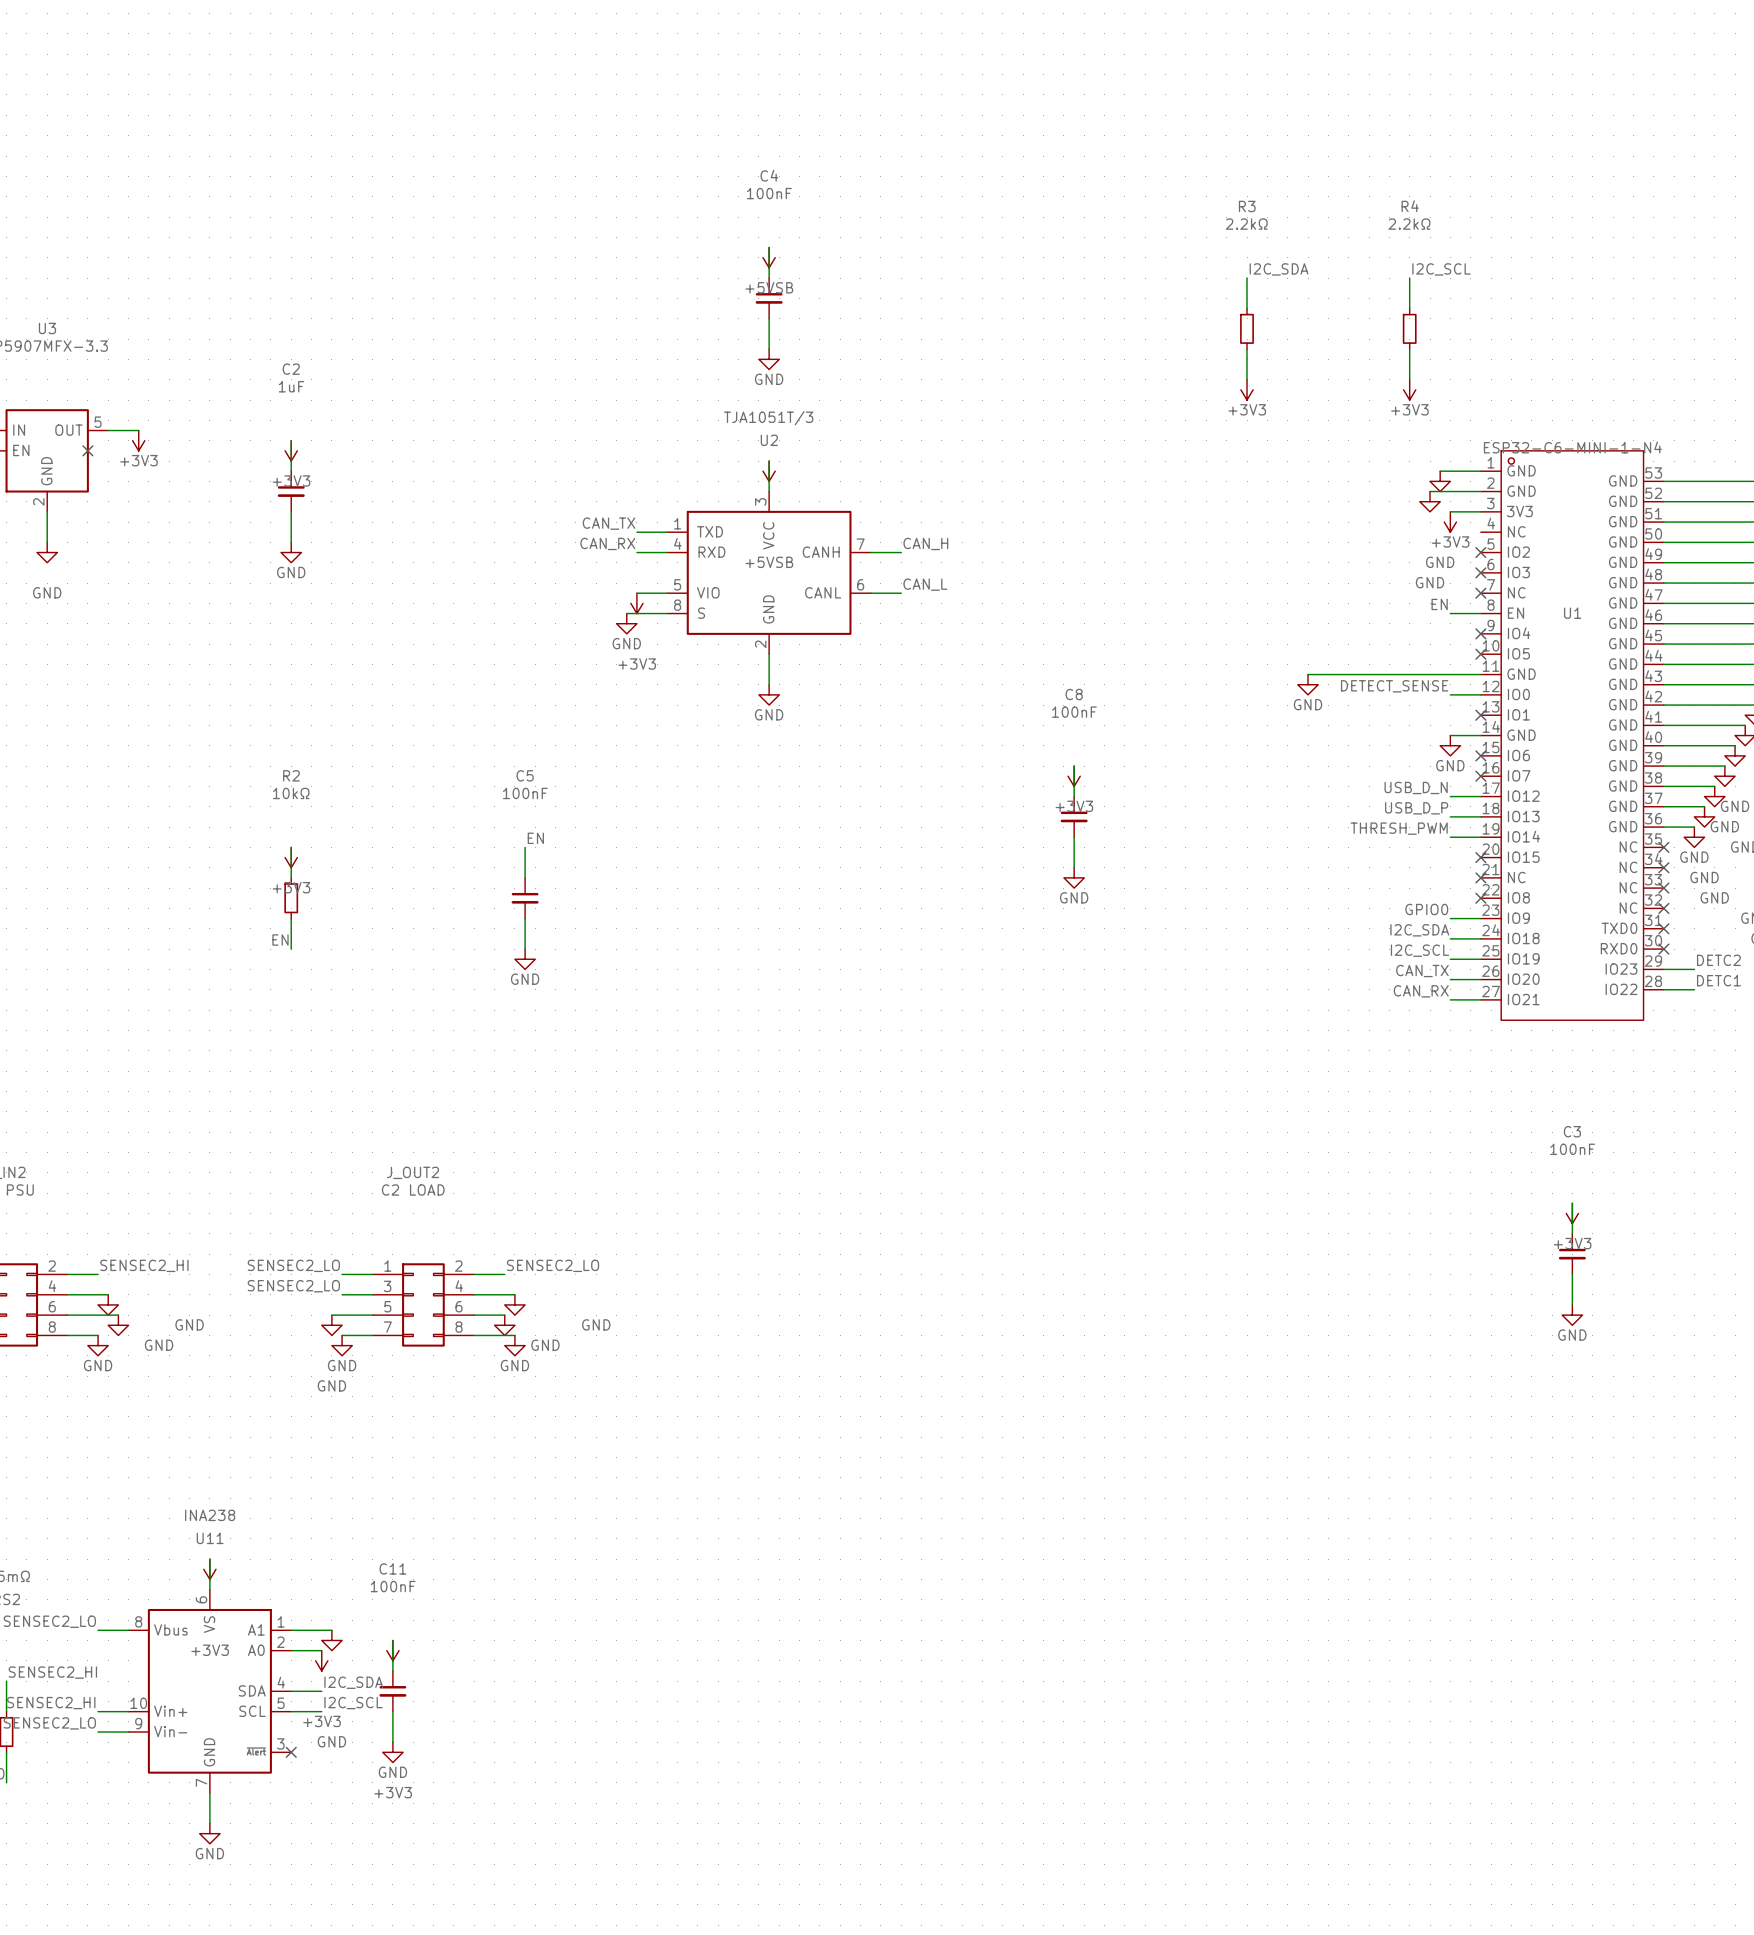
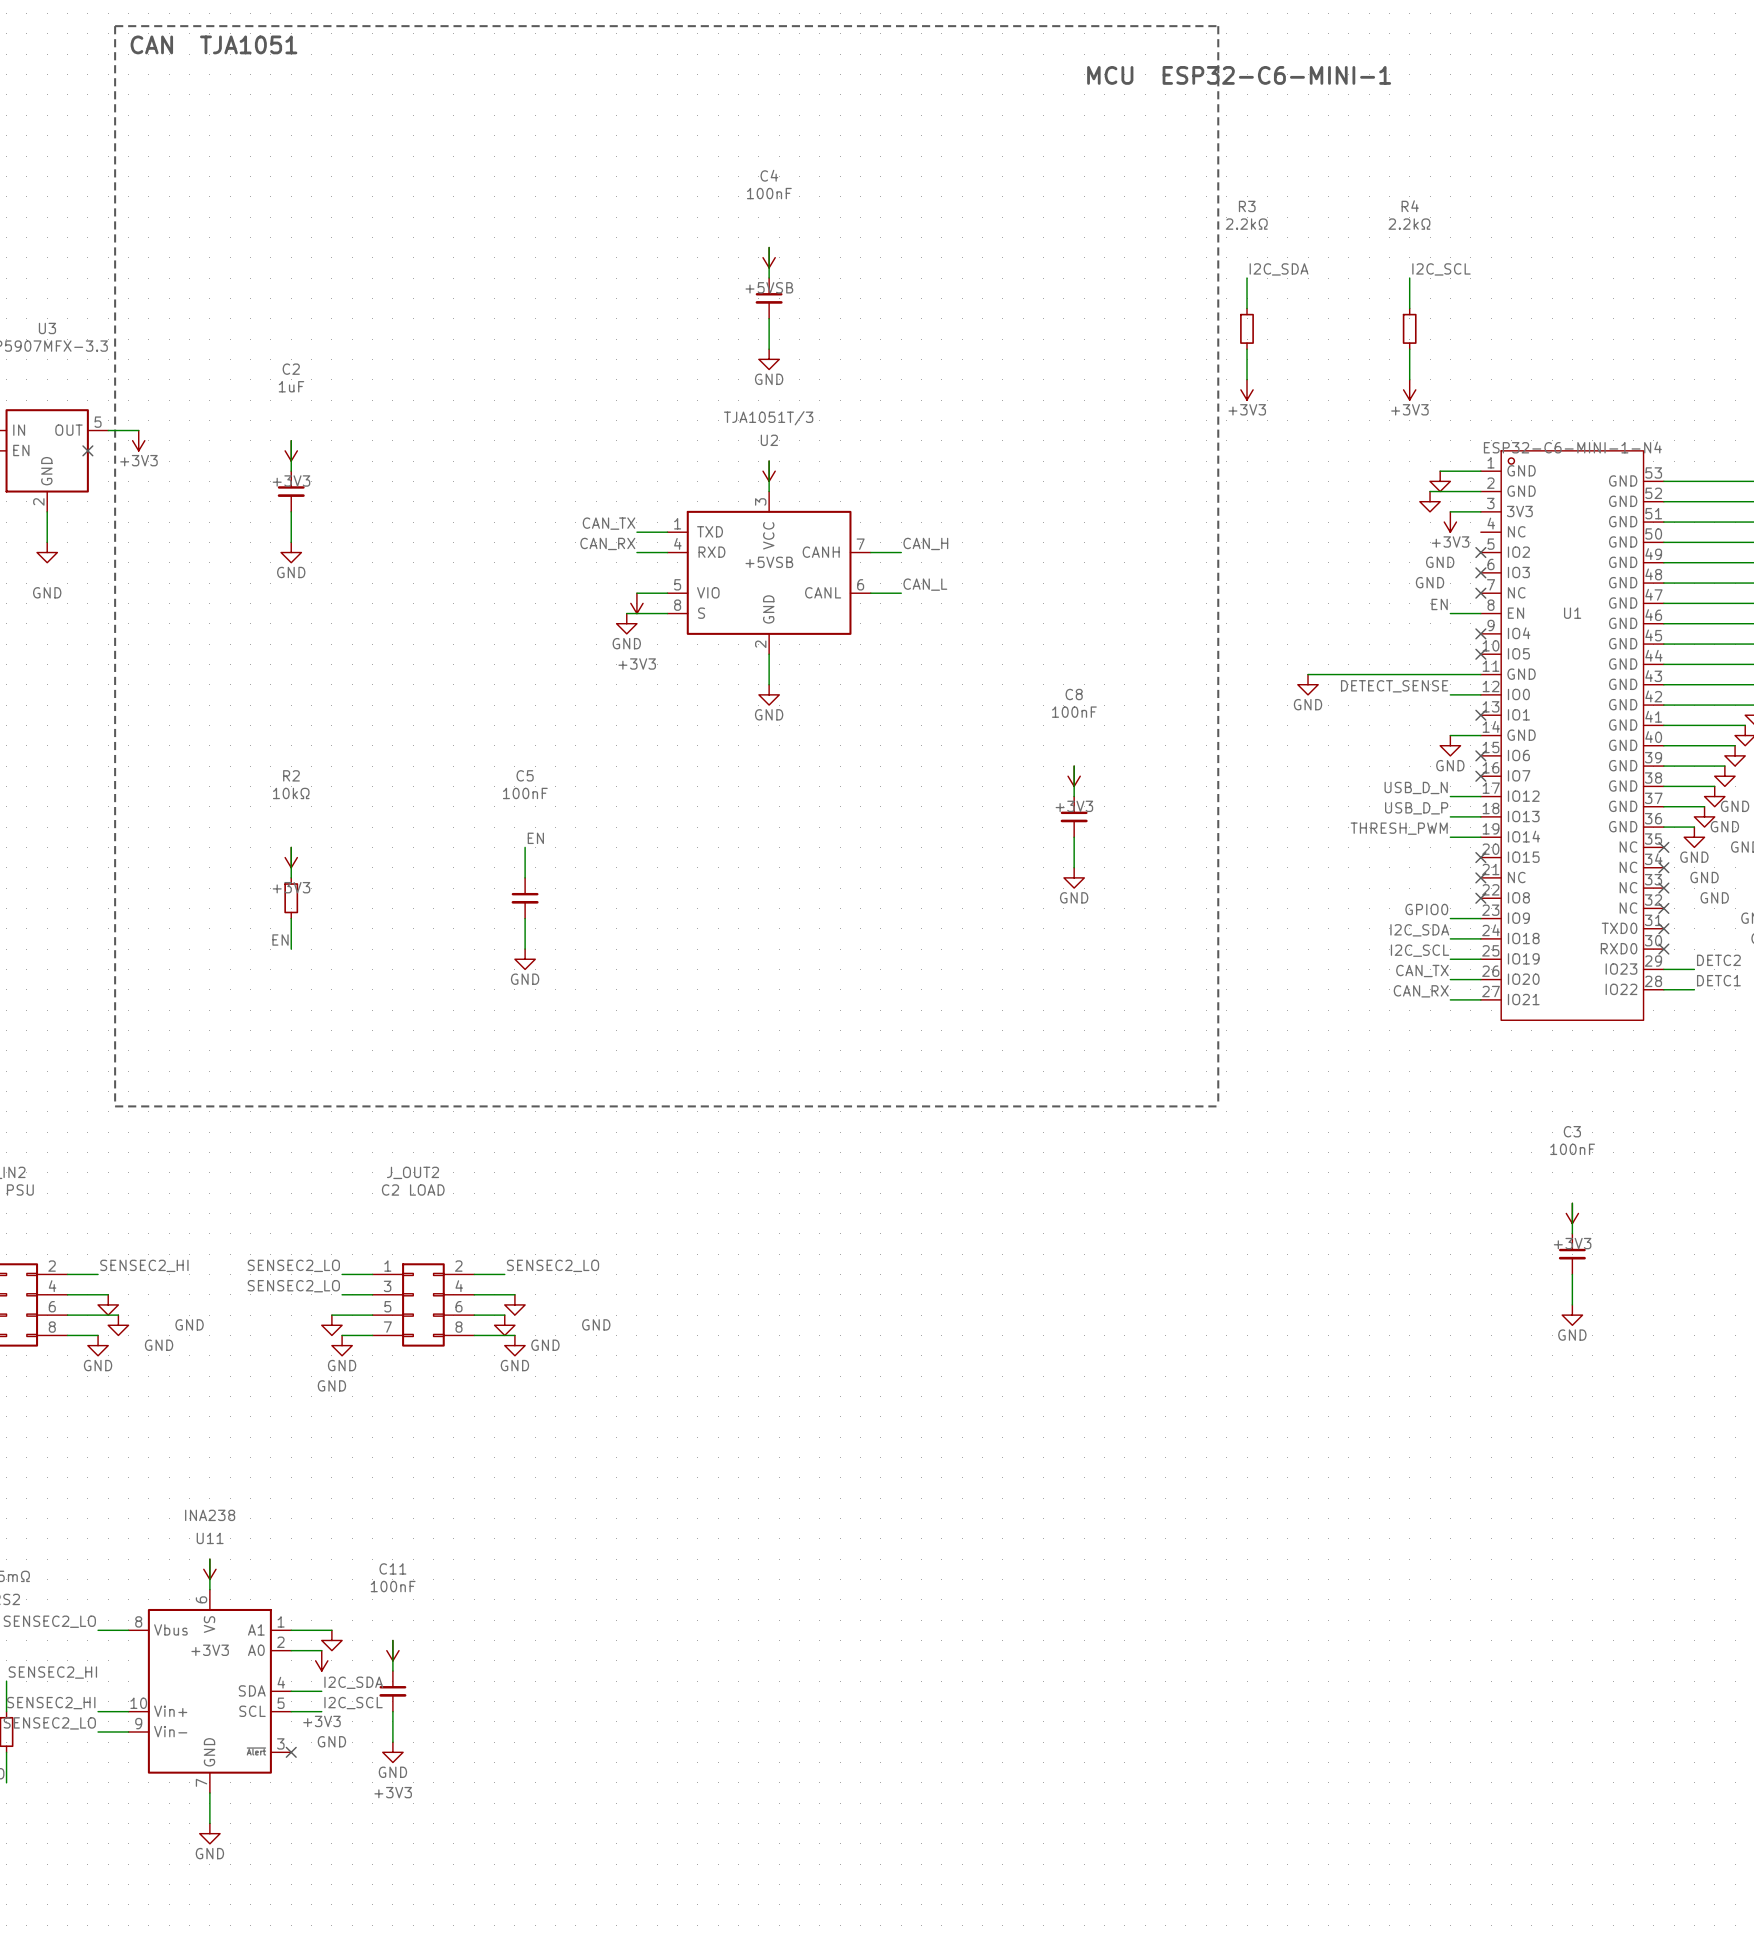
line: none -> (115, 26) (1218, 26) (1218, 1106) (115, 1106) (115, 26)
text: none -> CAN TJA1051 (213, 44)
text: none -> MCU ESP32-C6-MINI-1 (1239, 75)

